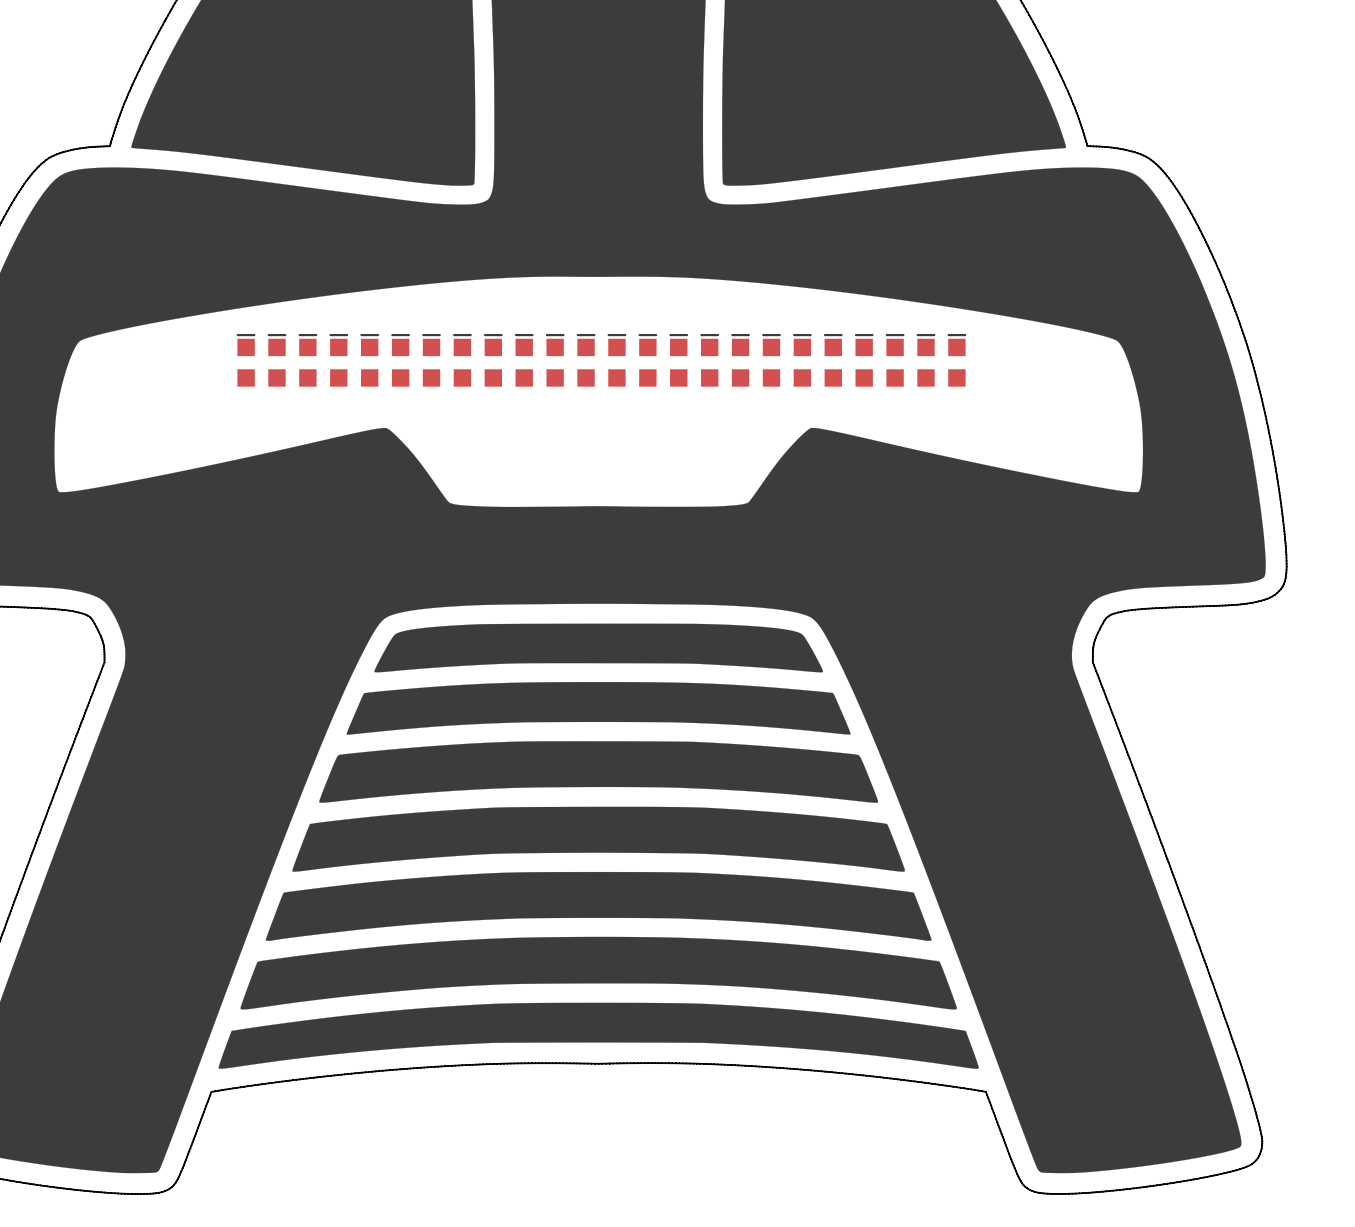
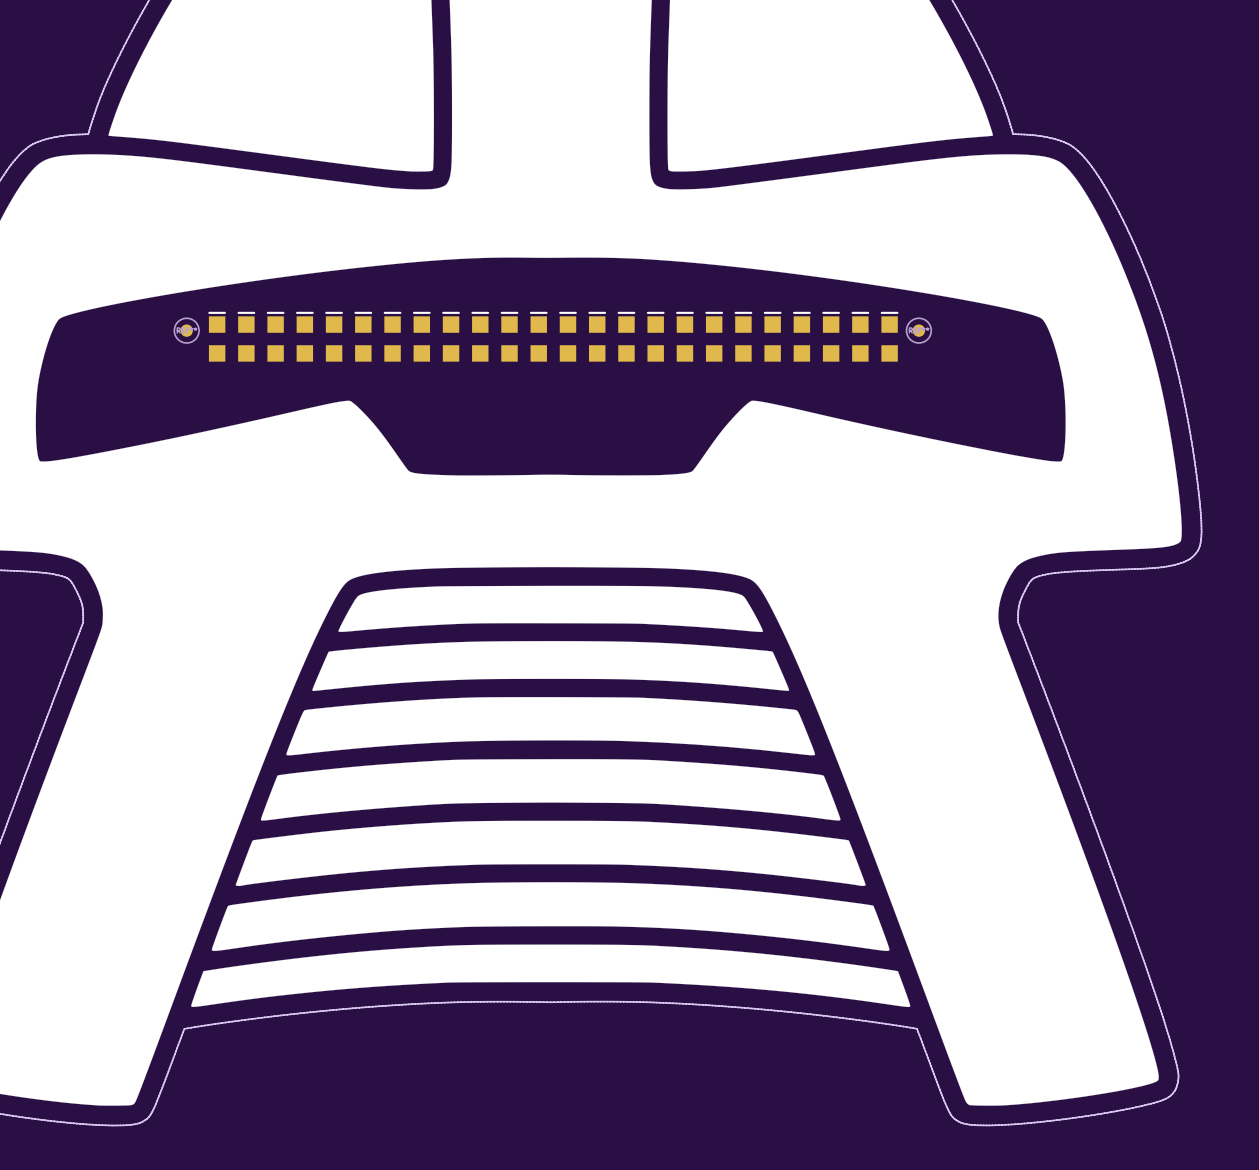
part: none -> (186, 330)
part: none -> (918, 330)

